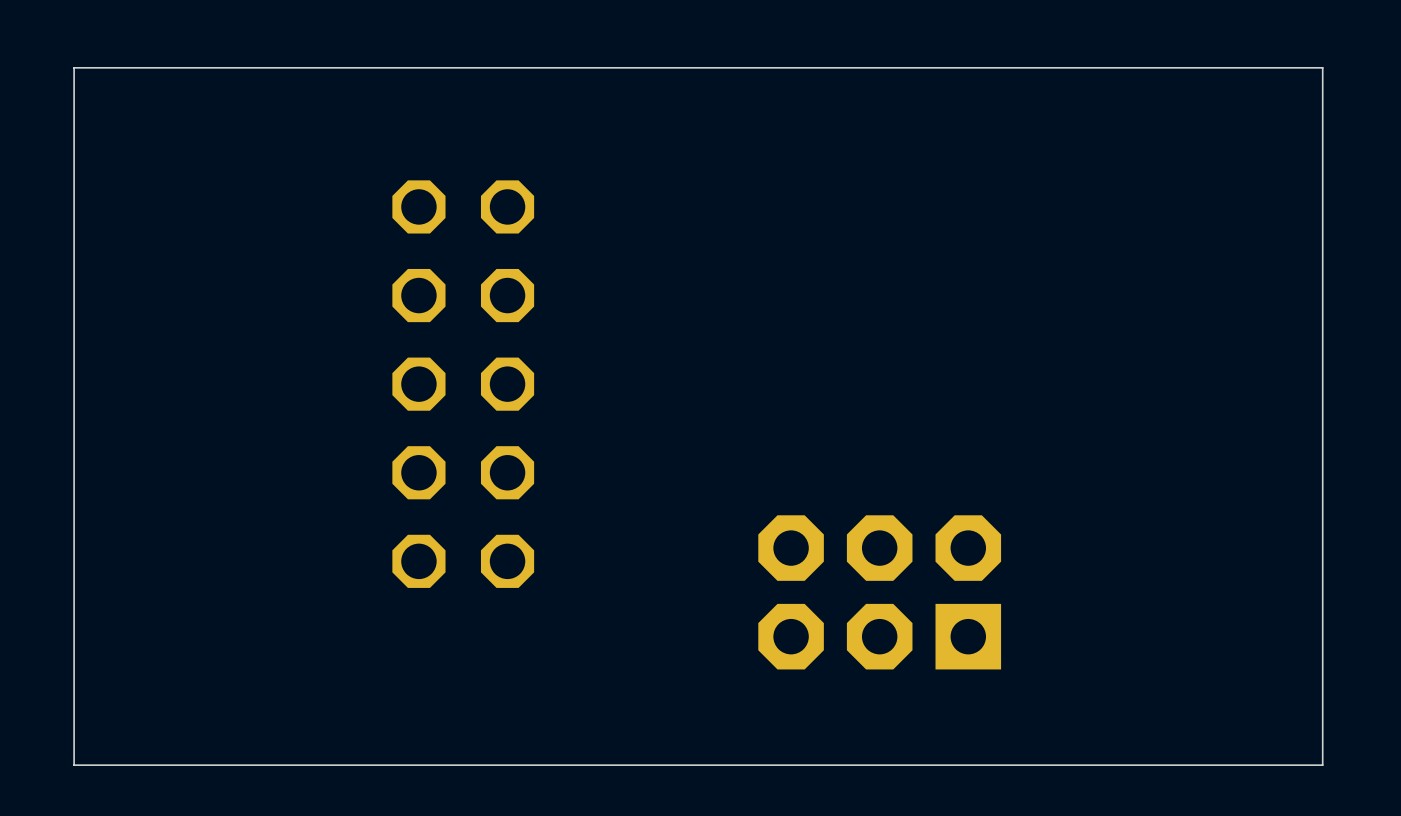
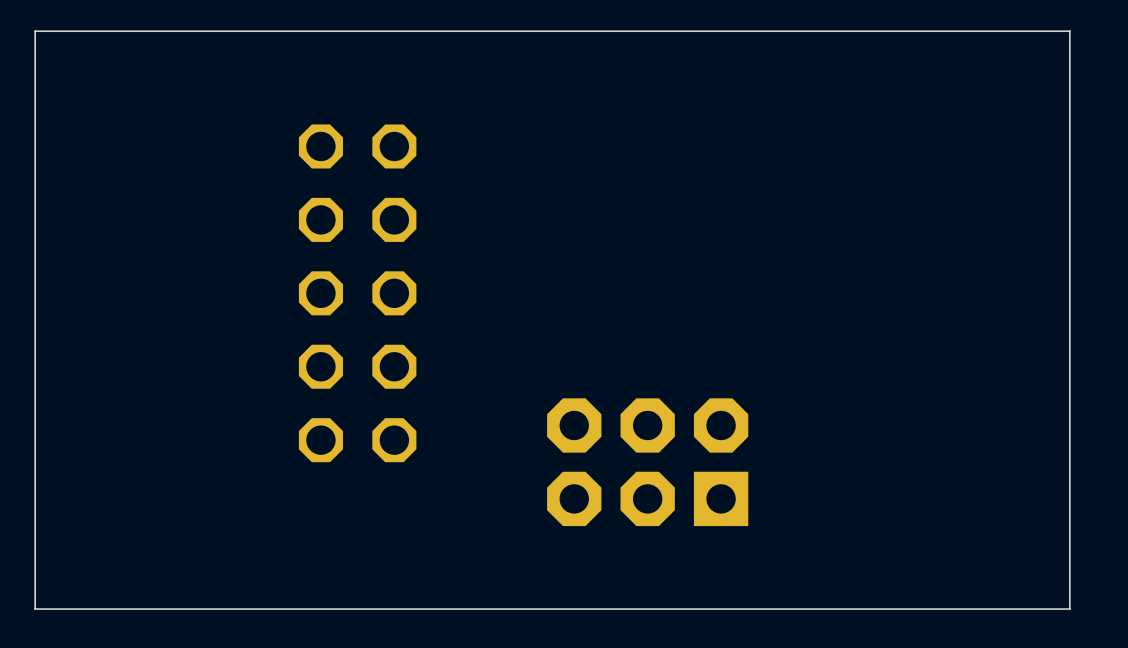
part position: (879, 592) -> (647, 462)

